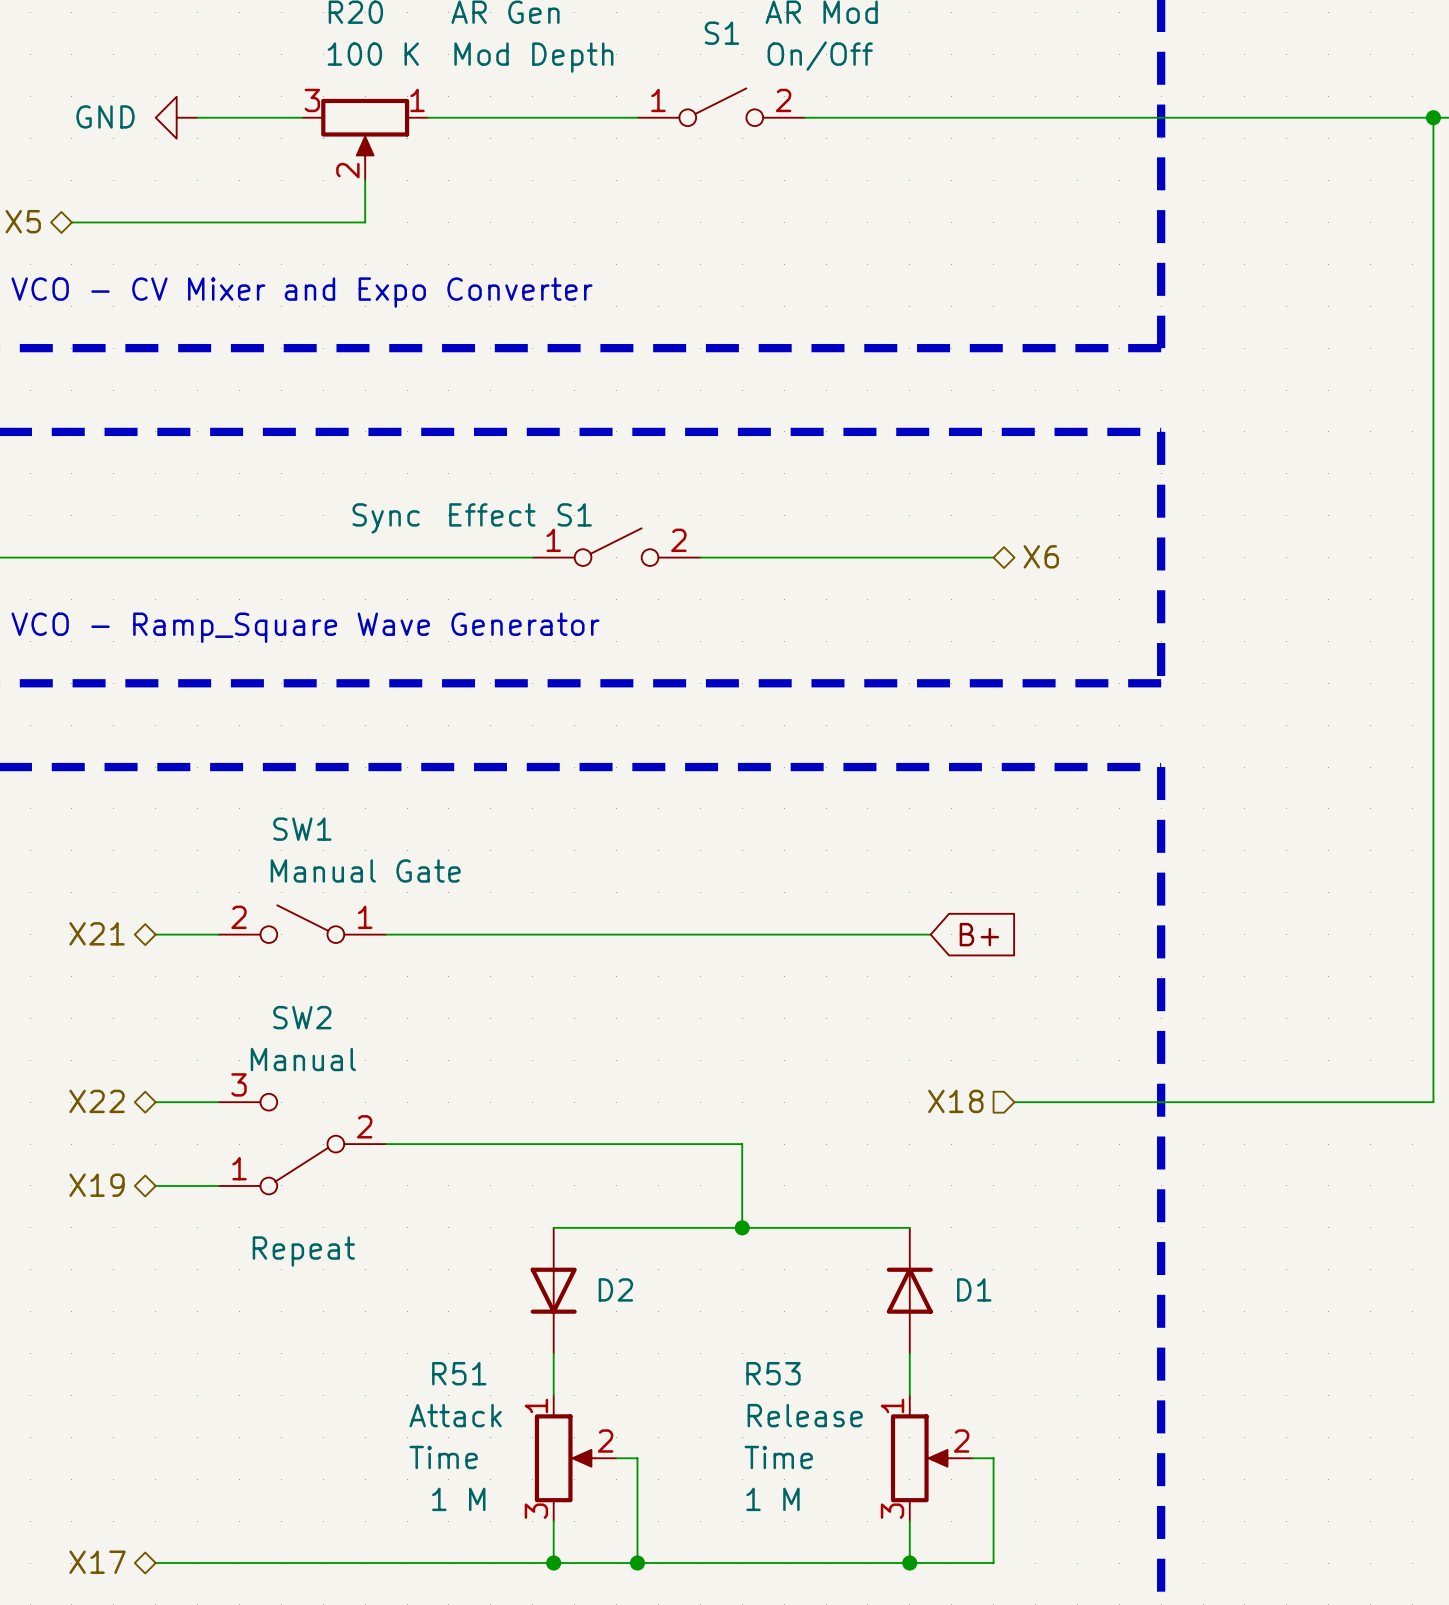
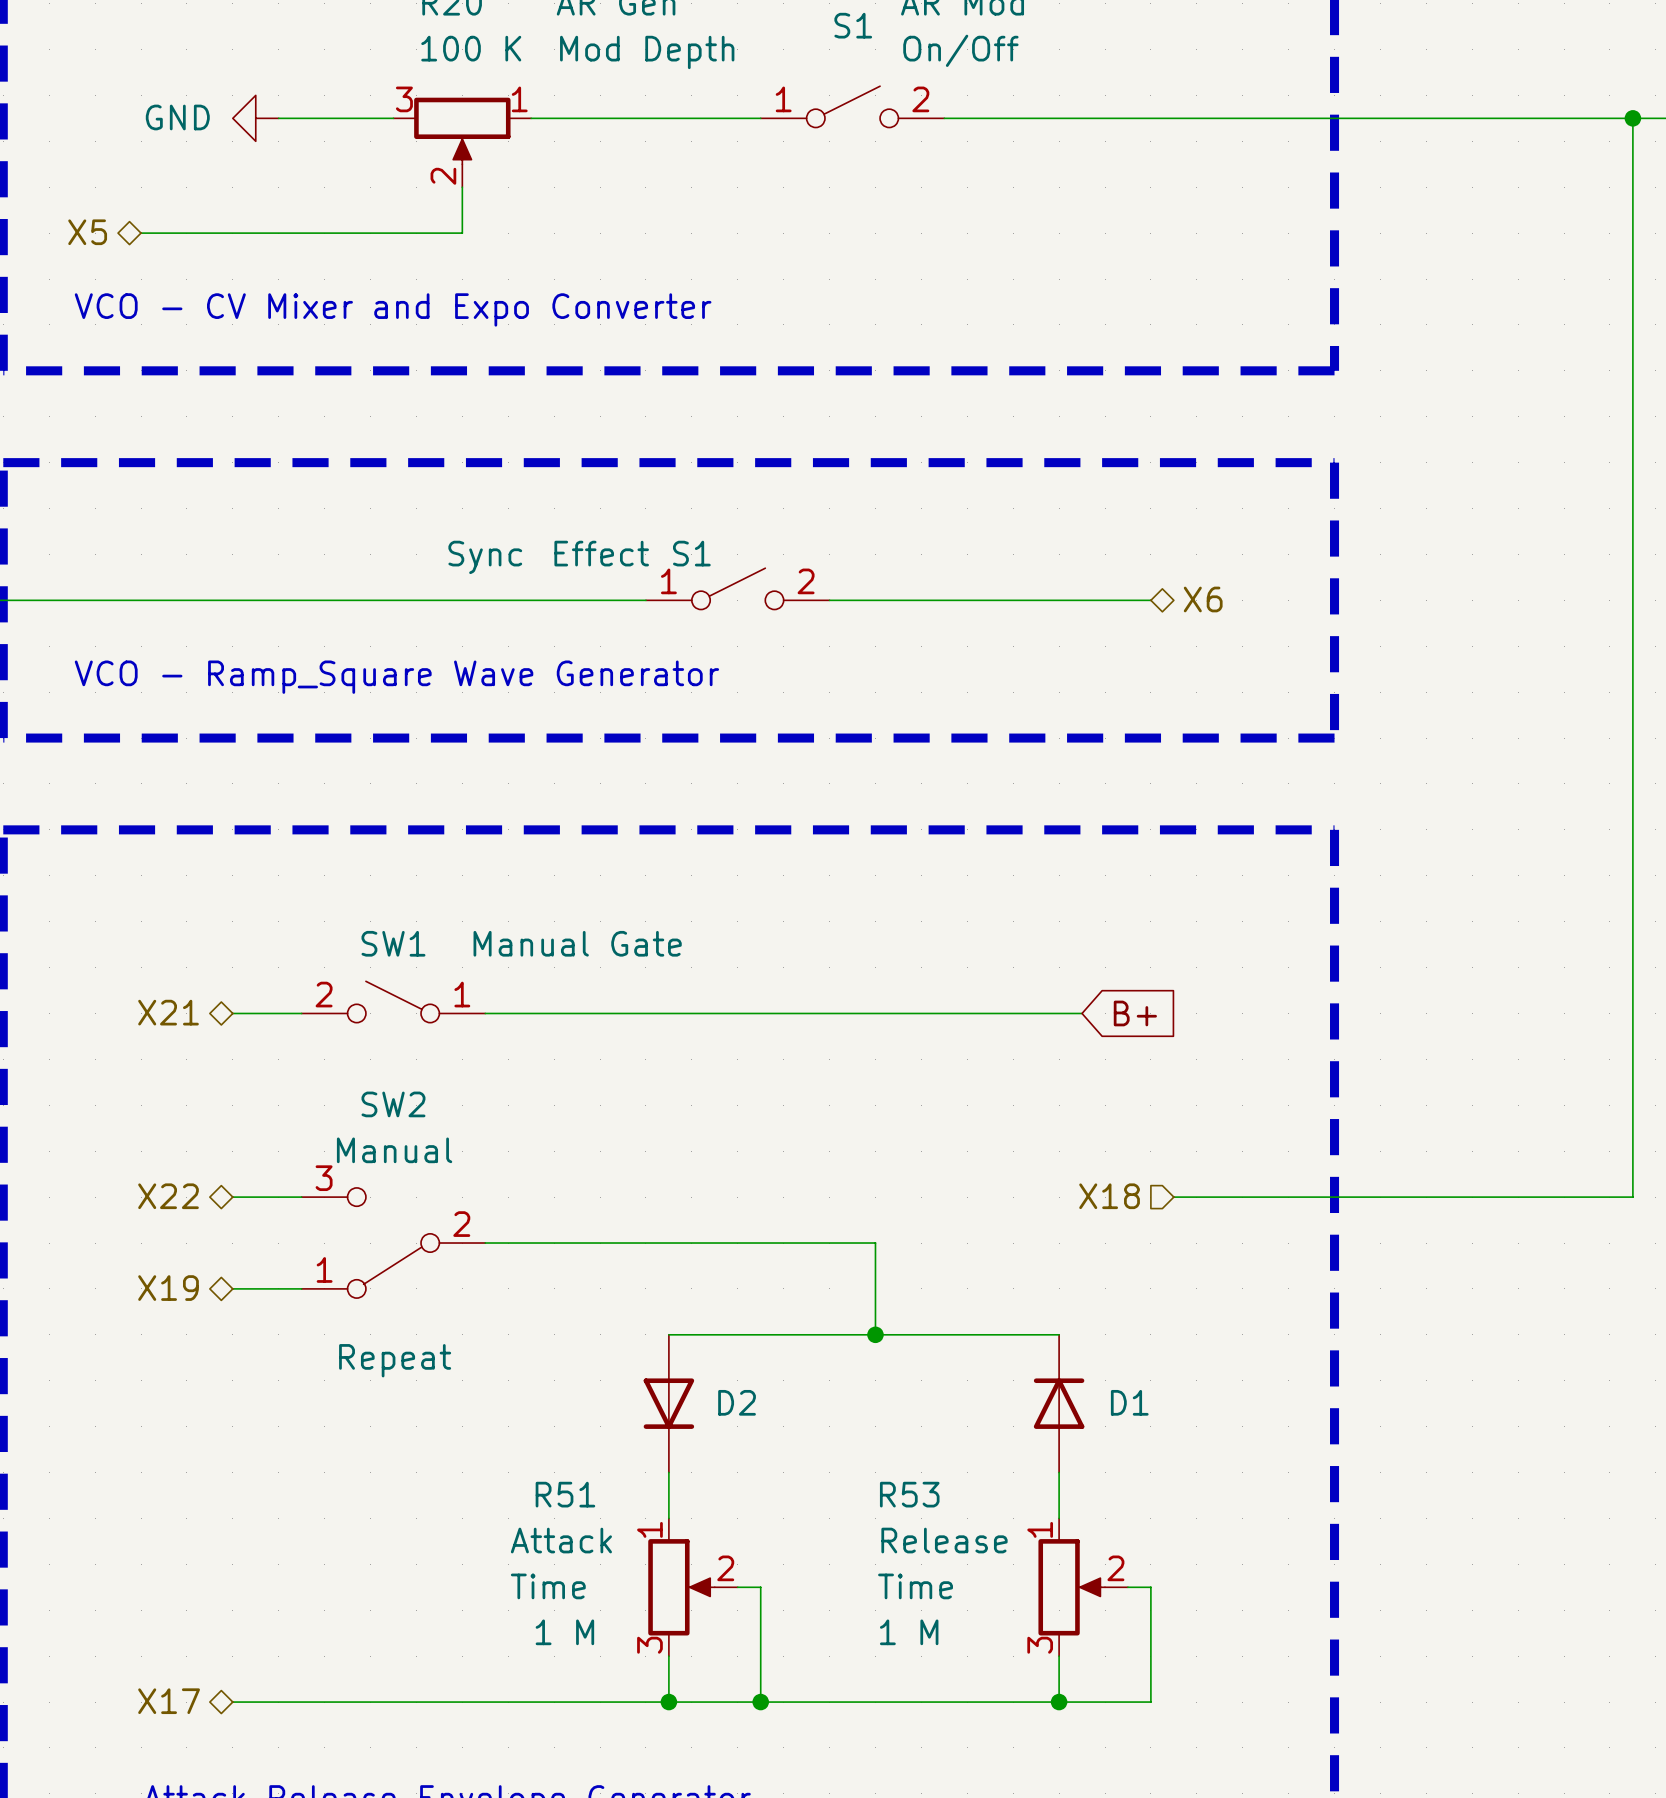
SW1 name position: SW1 (302, 829) -> SW1 (393, 943)
SW1 value position: Manual Gate (365, 871) -> Manual Gate (577, 943)

